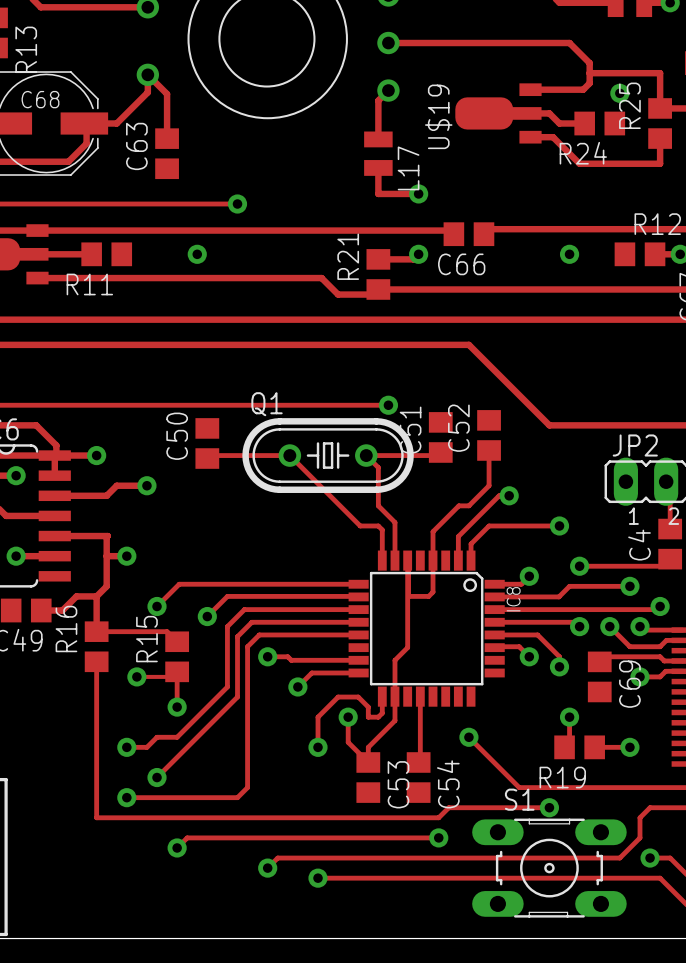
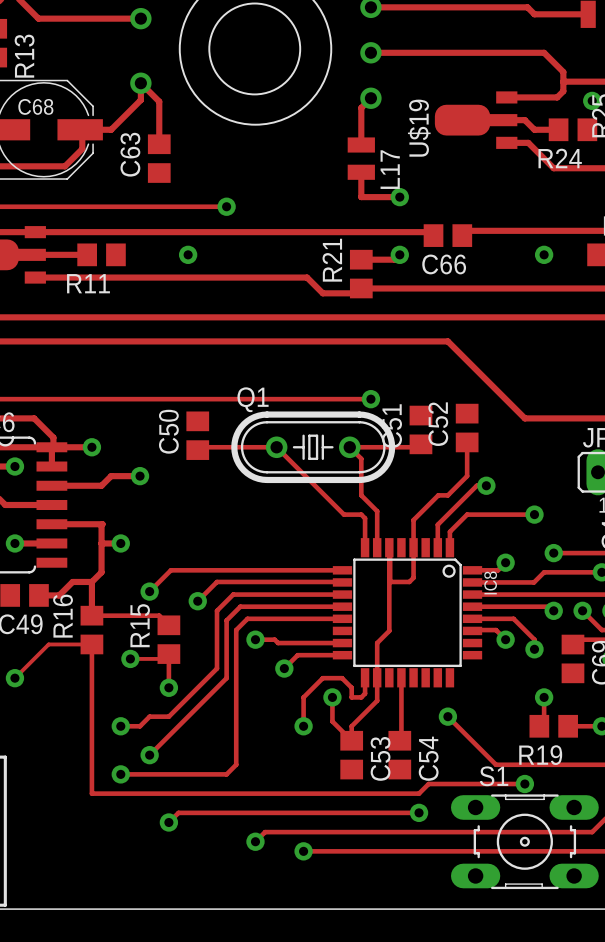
track: none -> (91, 644) (48, 644) (14, 678)
via: none -> (14, 678)

